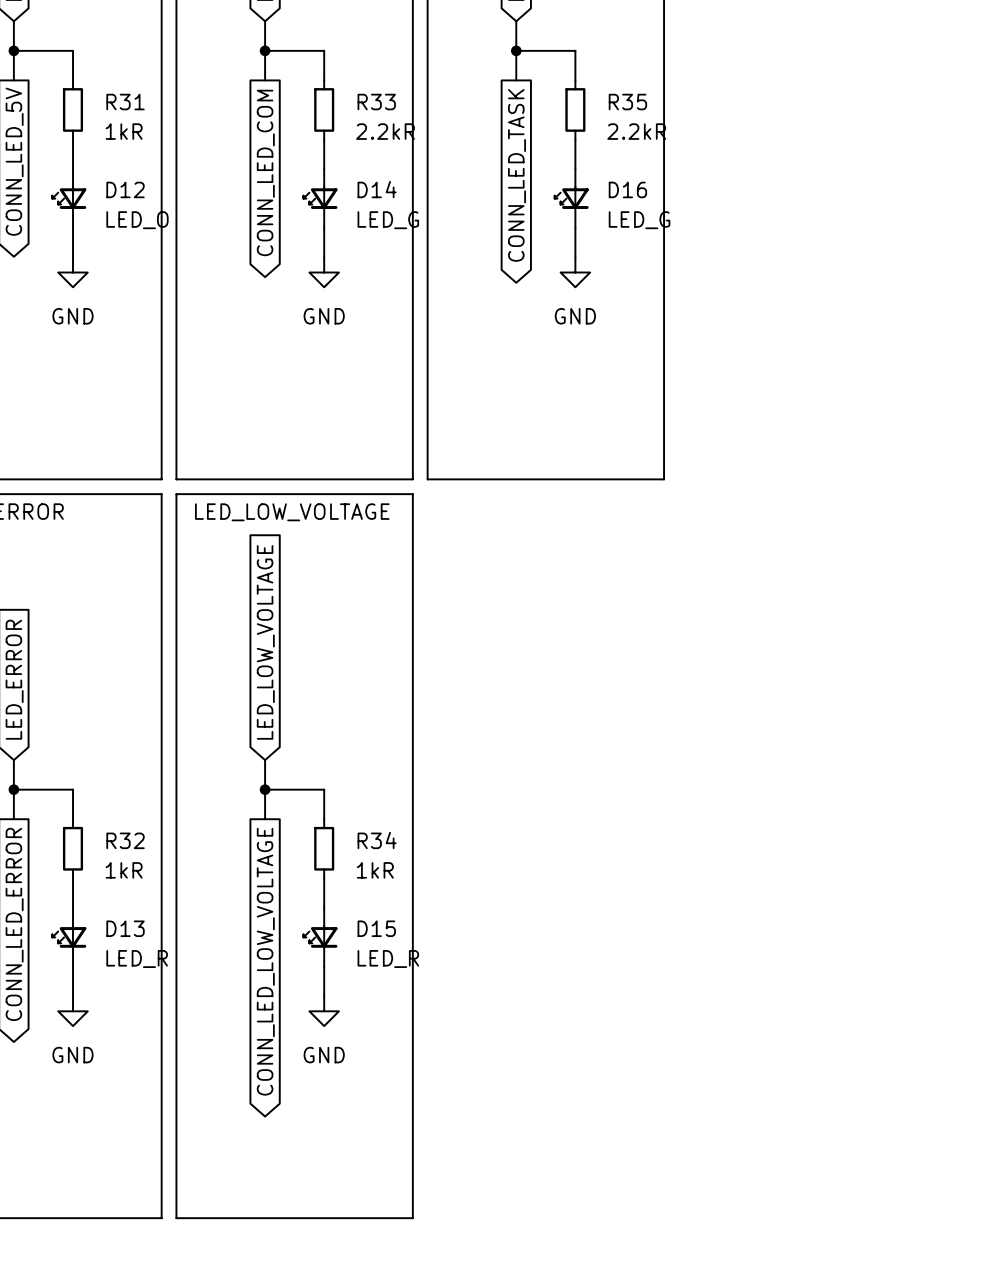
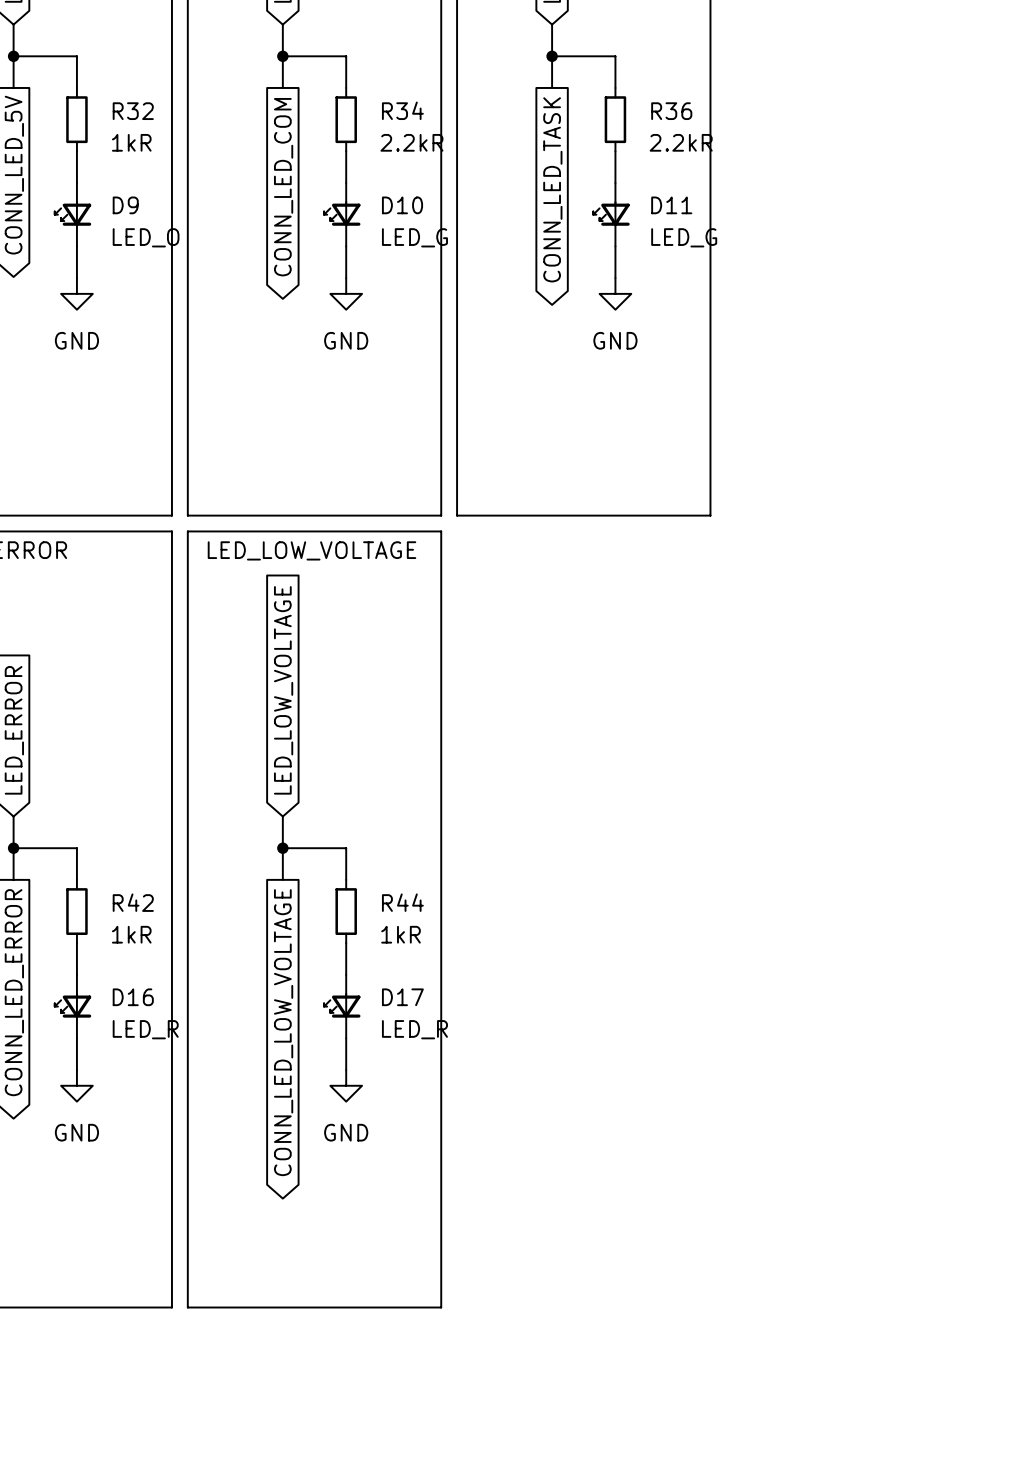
R31 name: R31 (125, 102) -> R32 (133, 111)
R33 name: R33 (376, 102) -> R34 (402, 110)
R35 name: R35 (627, 102) -> R36 (671, 111)
D12 name: D12 (125, 189) -> D9 (125, 205)
D14 name: D14 (377, 189) -> D10 (402, 205)
D16 name: D16 (627, 189) -> D11 (671, 205)
R32 name: R32 (125, 840) -> R42 (133, 902)
R34 name: R34 (377, 840) -> R44 (402, 902)
D13 name: D13 (125, 928) -> D16 (133, 997)
D15 name: D15 (376, 928) -> D17 (402, 997)

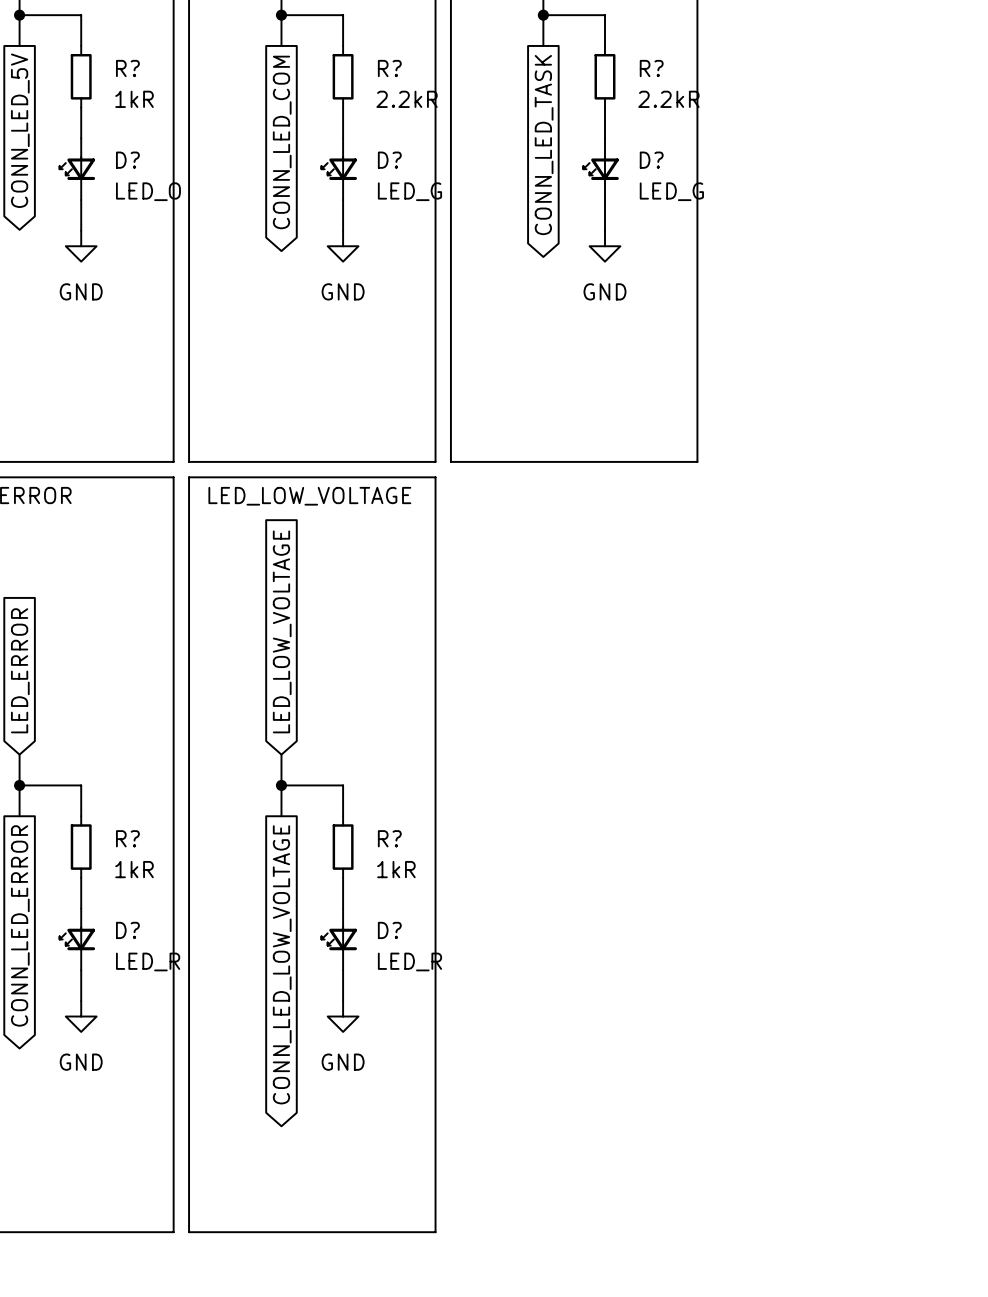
R34 name: R34 (402, 110) -> R? (389, 68)
R32 name: R32 (133, 111) -> R? (127, 68)
R36 name: R36 (671, 111) -> R? (651, 68)
D9 name: D9 (125, 205) -> D? (127, 160)
D10 name: D10 (402, 205) -> D? (389, 160)
D11 name: D11 (671, 205) -> D? (651, 160)
R42 name: R42 (133, 902) -> R? (127, 838)
R44 name: R44 (402, 902) -> R? (389, 838)
D16 name: D16 (133, 997) -> D? (127, 930)
D17 name: D17 (402, 997) -> D? (389, 930)

